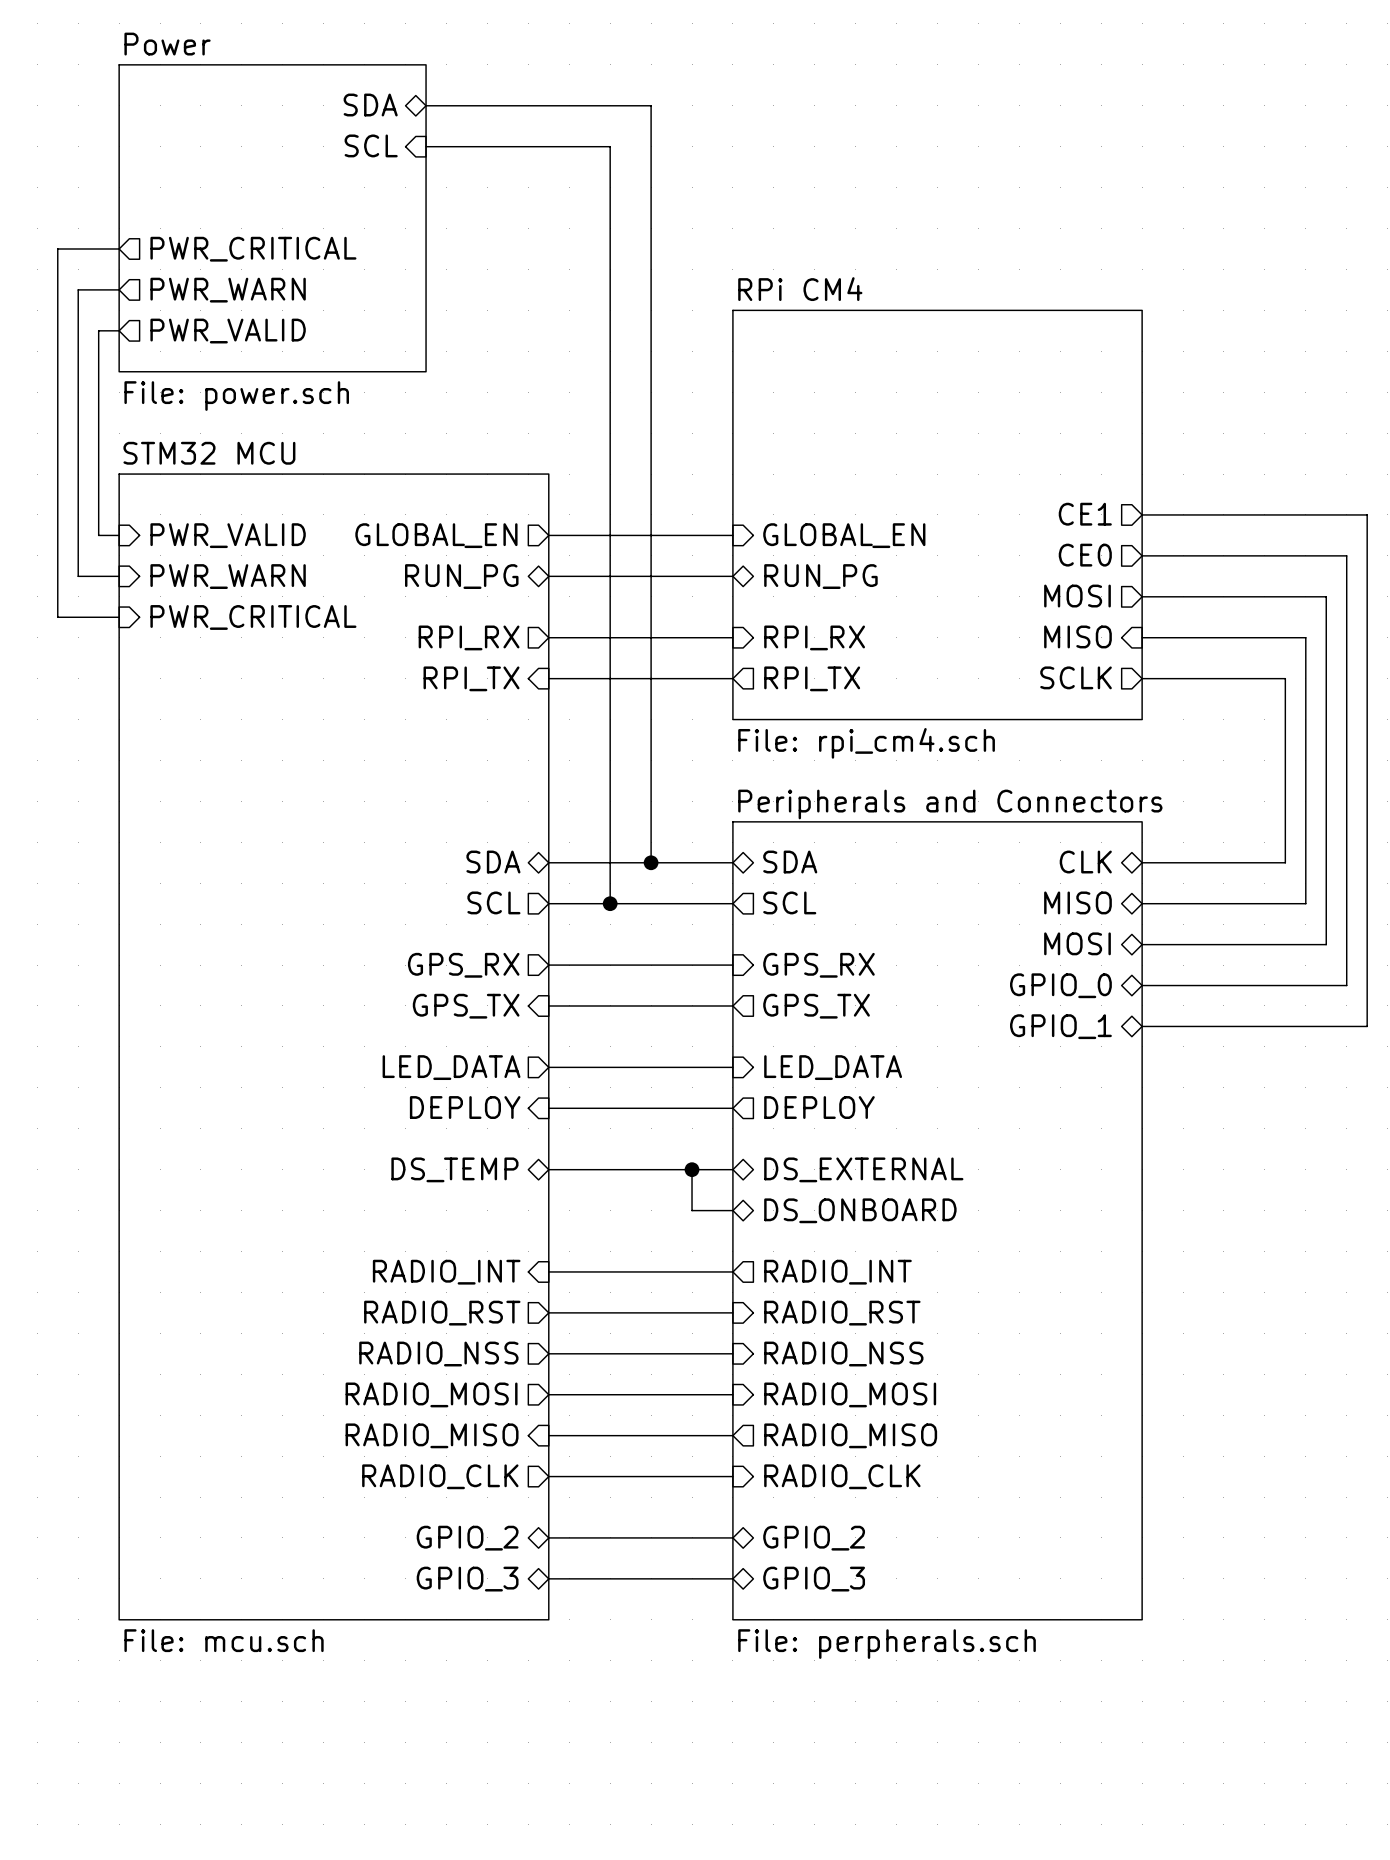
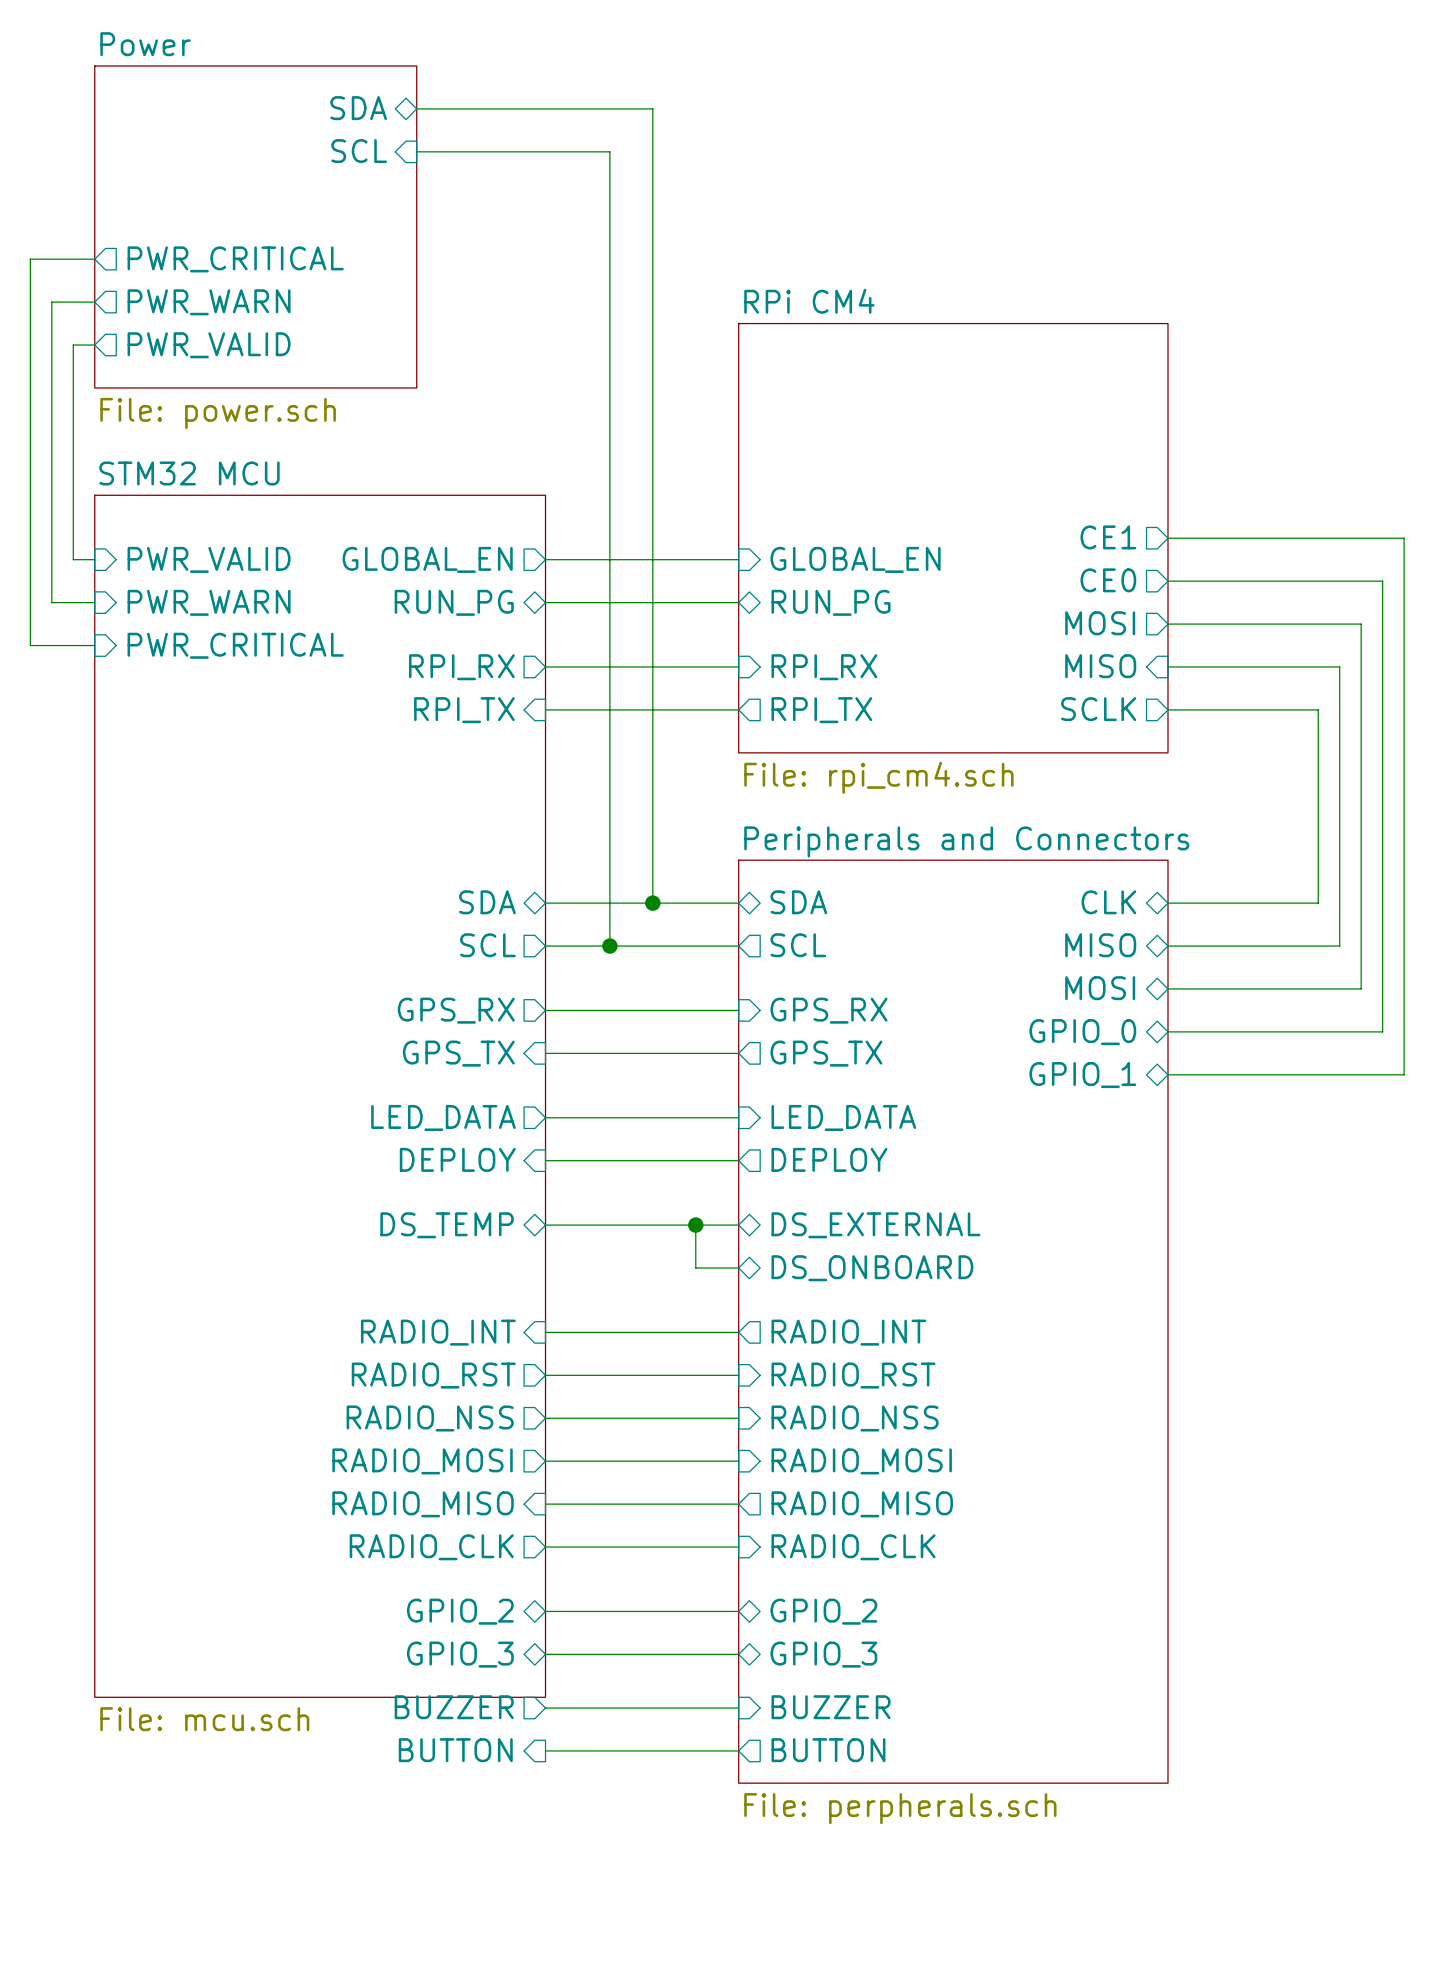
sheet Peripherals and Connectors: File: perpherals.sch (937, 1220) -> none
sheet Peripherals and Connectors: none -> File: perpherals.sch (953, 1321)
sheet pin: none -> BUZZER (454, 1707)
sheet pin: none -> BUZZER (831, 1707)
wire: none -> (545, 1708) (738, 1708)
sheet pin: none -> BUTTON (455, 1750)
wire: none -> (545, 1750) (738, 1750)
sheet pin: none -> BUTTON (828, 1750)

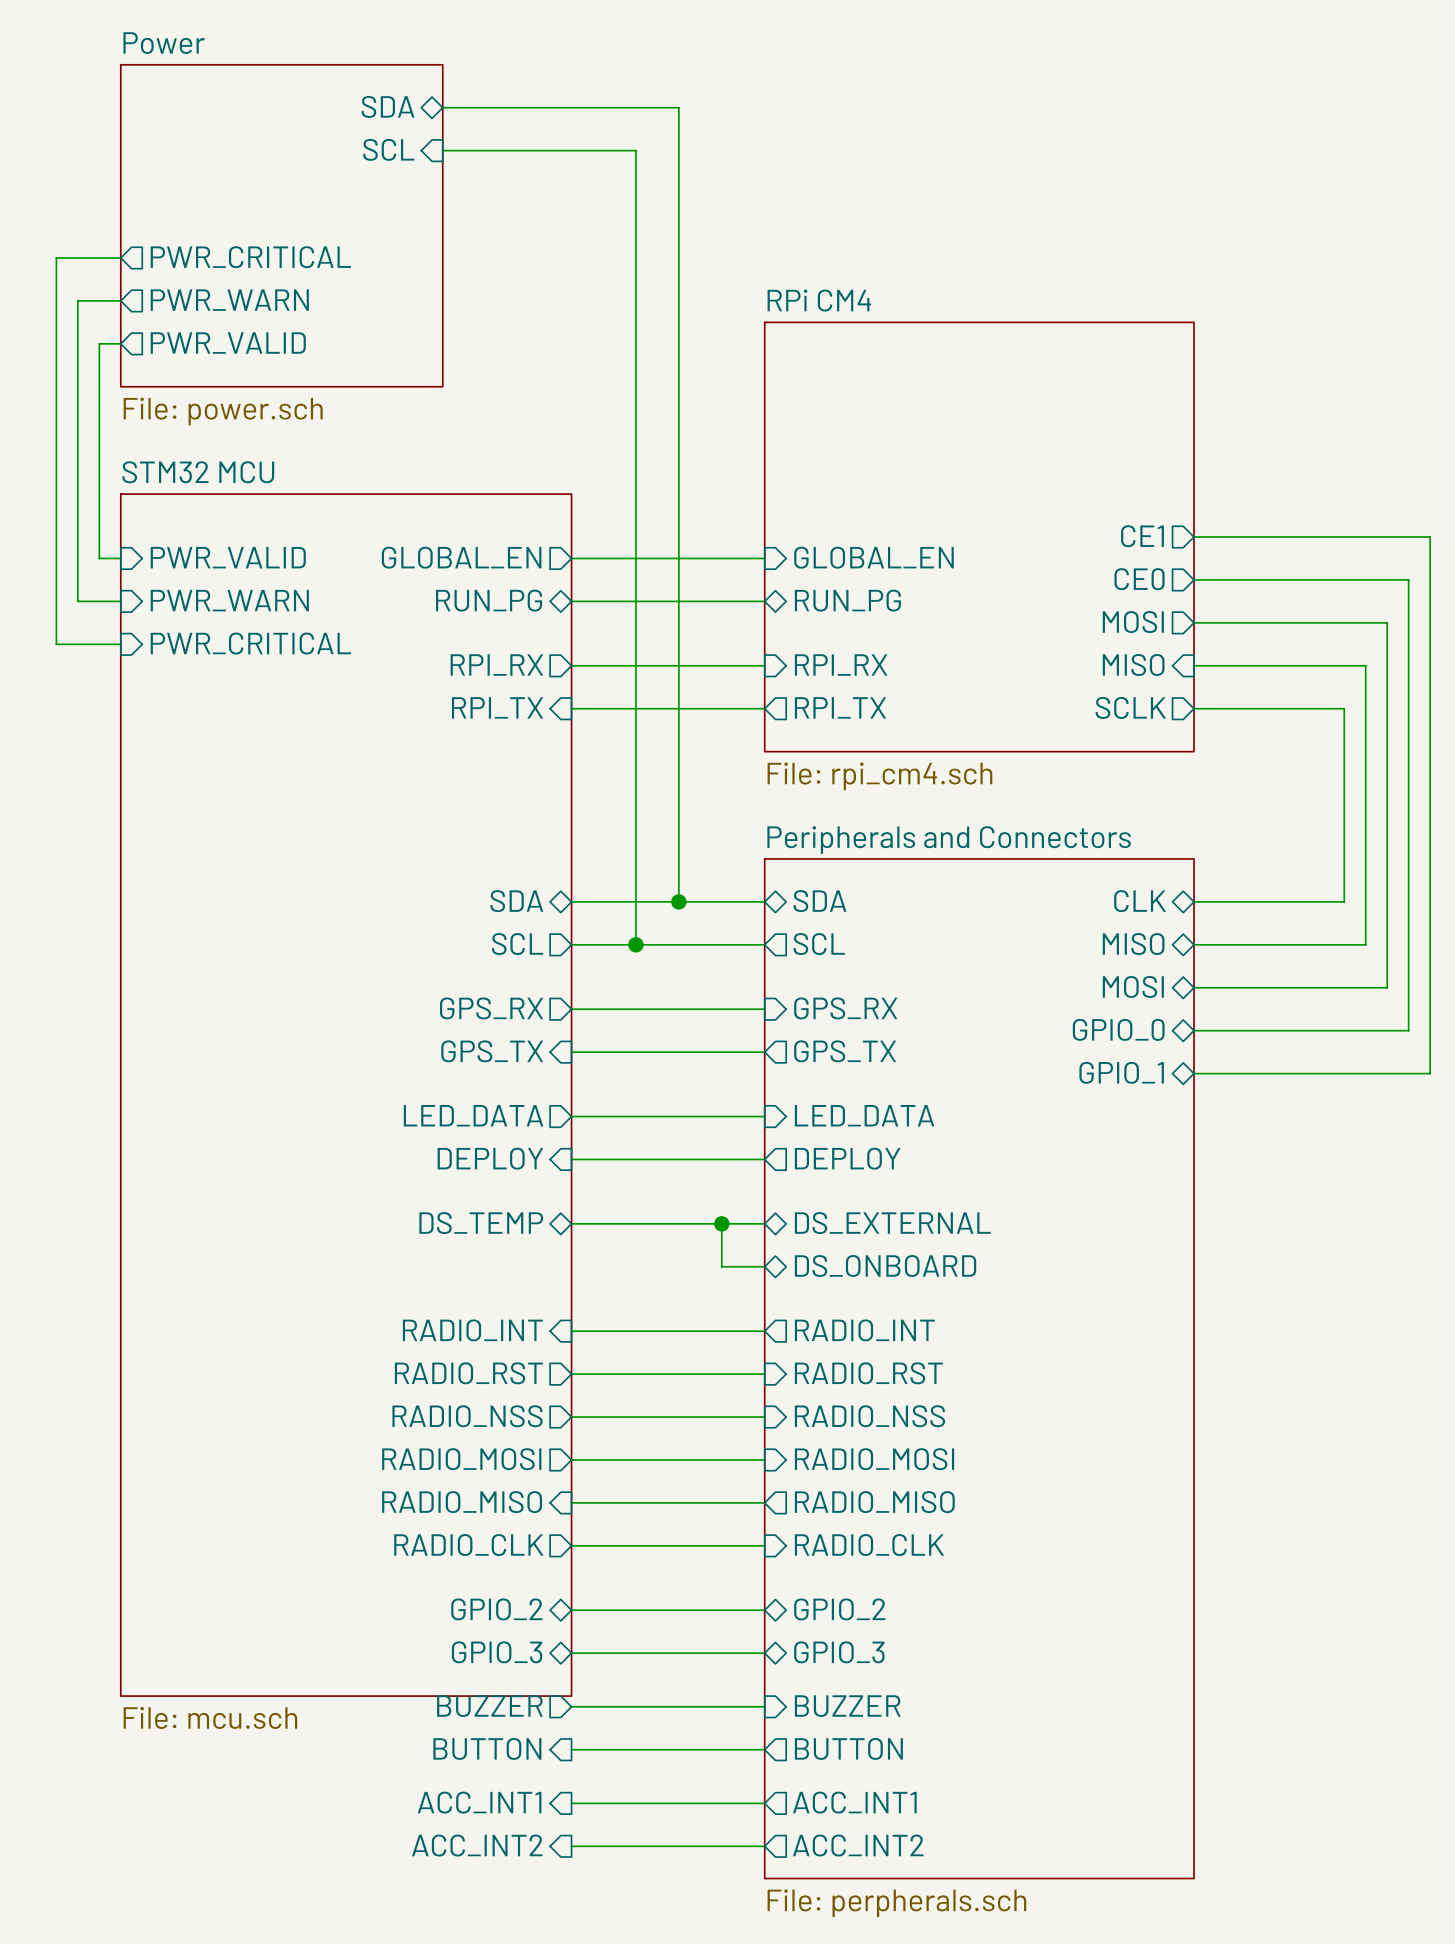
sheet Peripherals and Connectors: File: perpherals.sch (953, 1321) -> none
sheet Peripherals and Connectors: none -> File: perpherals.sch (979, 1368)
sheet pin: none -> ACC_INT1 (479, 1802)
wire: none -> (571, 1803) (764, 1803)
sheet pin: none -> ACC_INT1 (854, 1802)
sheet pin: none -> ACC_INT2 (477, 1845)
wire: none -> (571, 1846) (764, 1846)
sheet pin: none -> ACC_INT2 (858, 1845)

